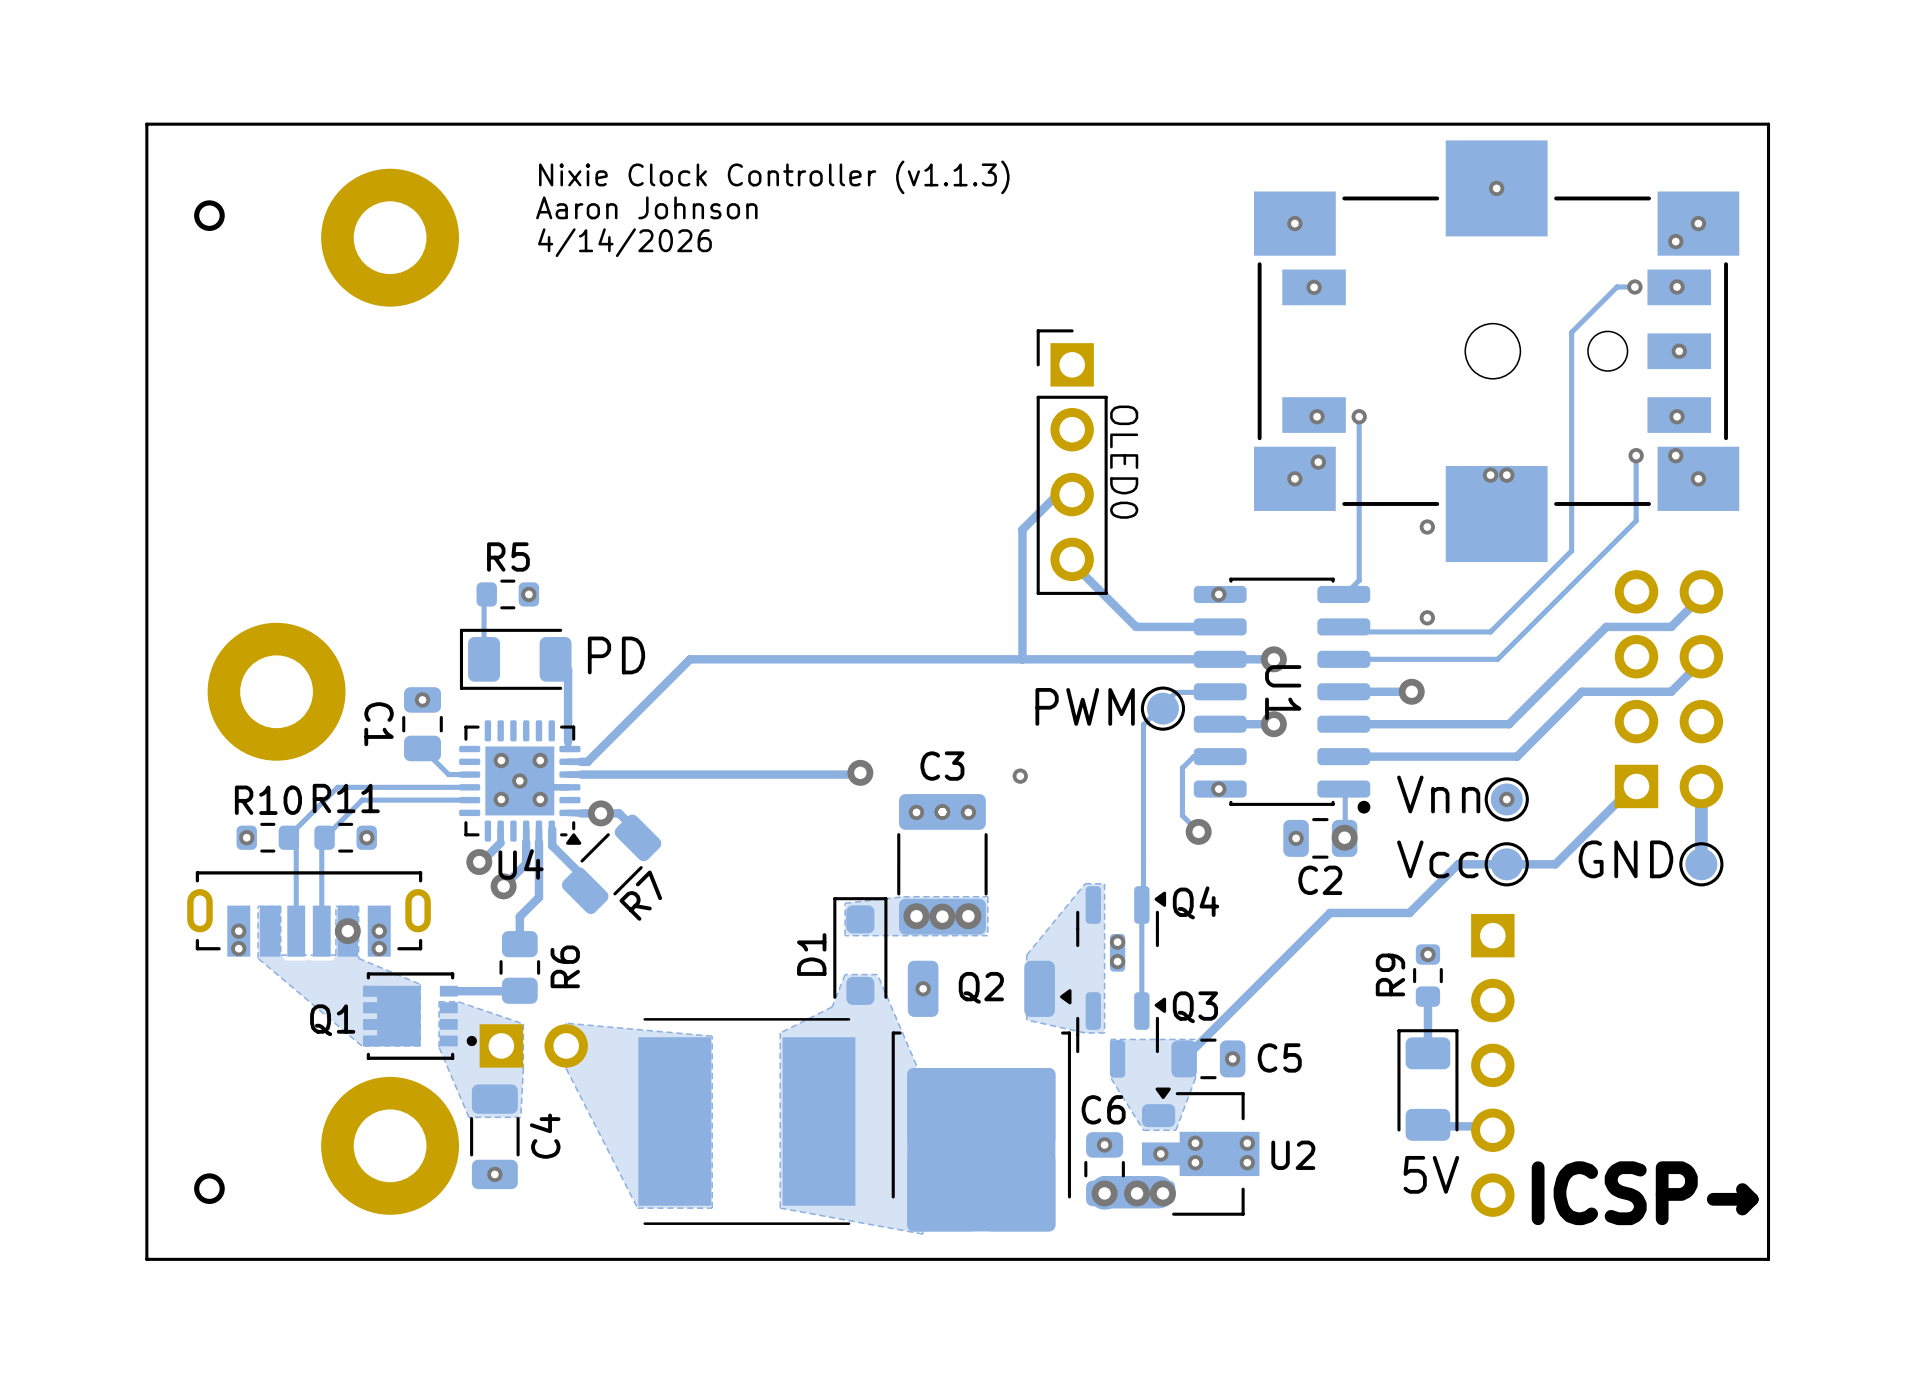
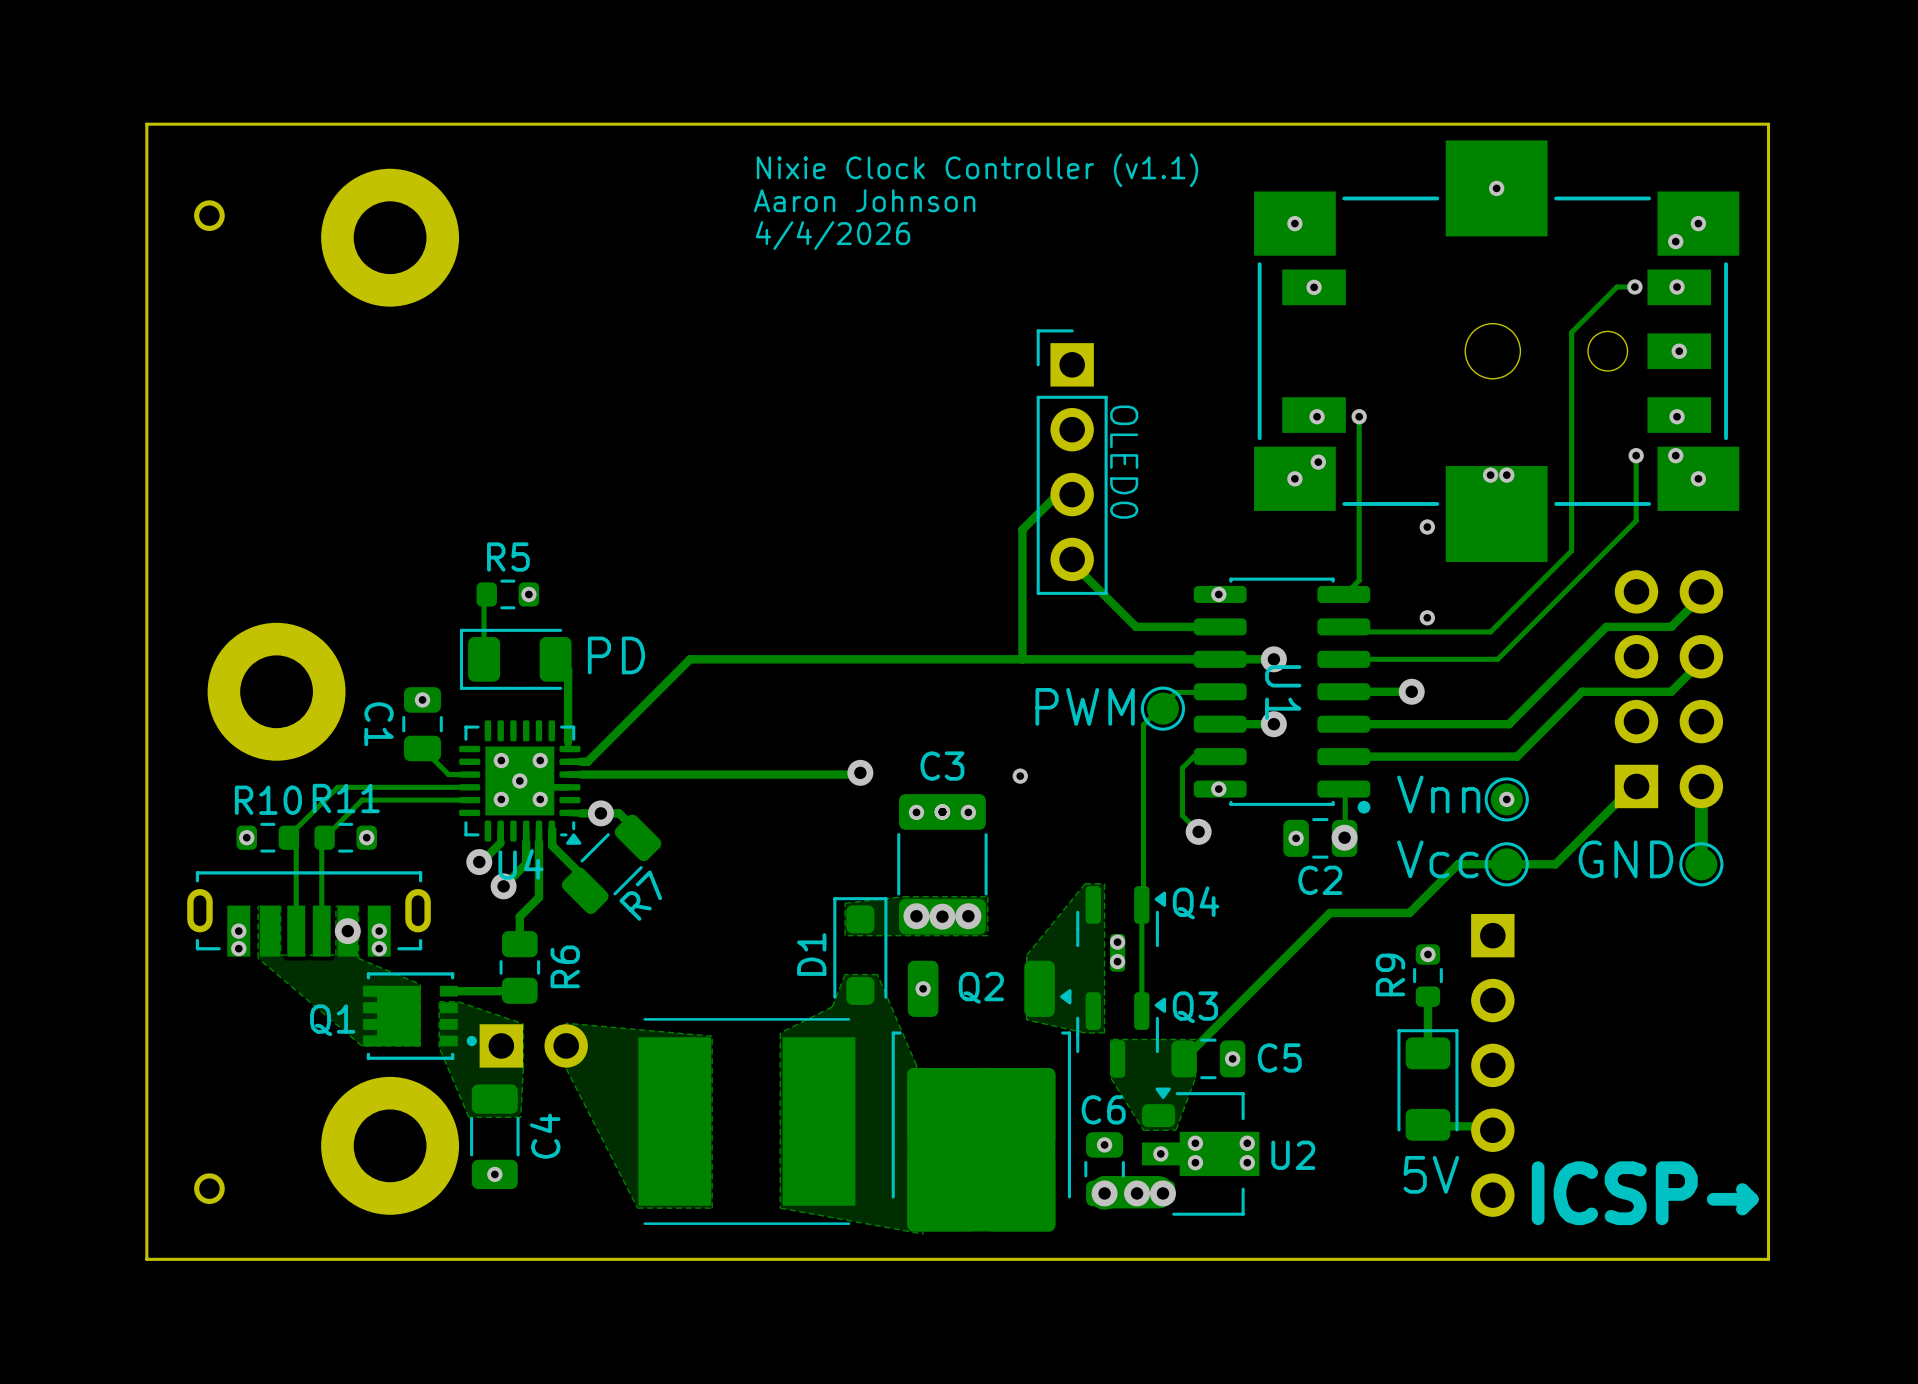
text: Nixie Clock Controller (v1.1.3) (774, 177) -> Nixie Clock Controller (v1.1) (977, 170)
text position: Aaron Johnson (646, 207) -> Aaron Johnson (864, 200)
text: none -> 4/4/2026 (833, 235)
text: 4/14/2026 (624, 242) -> none

